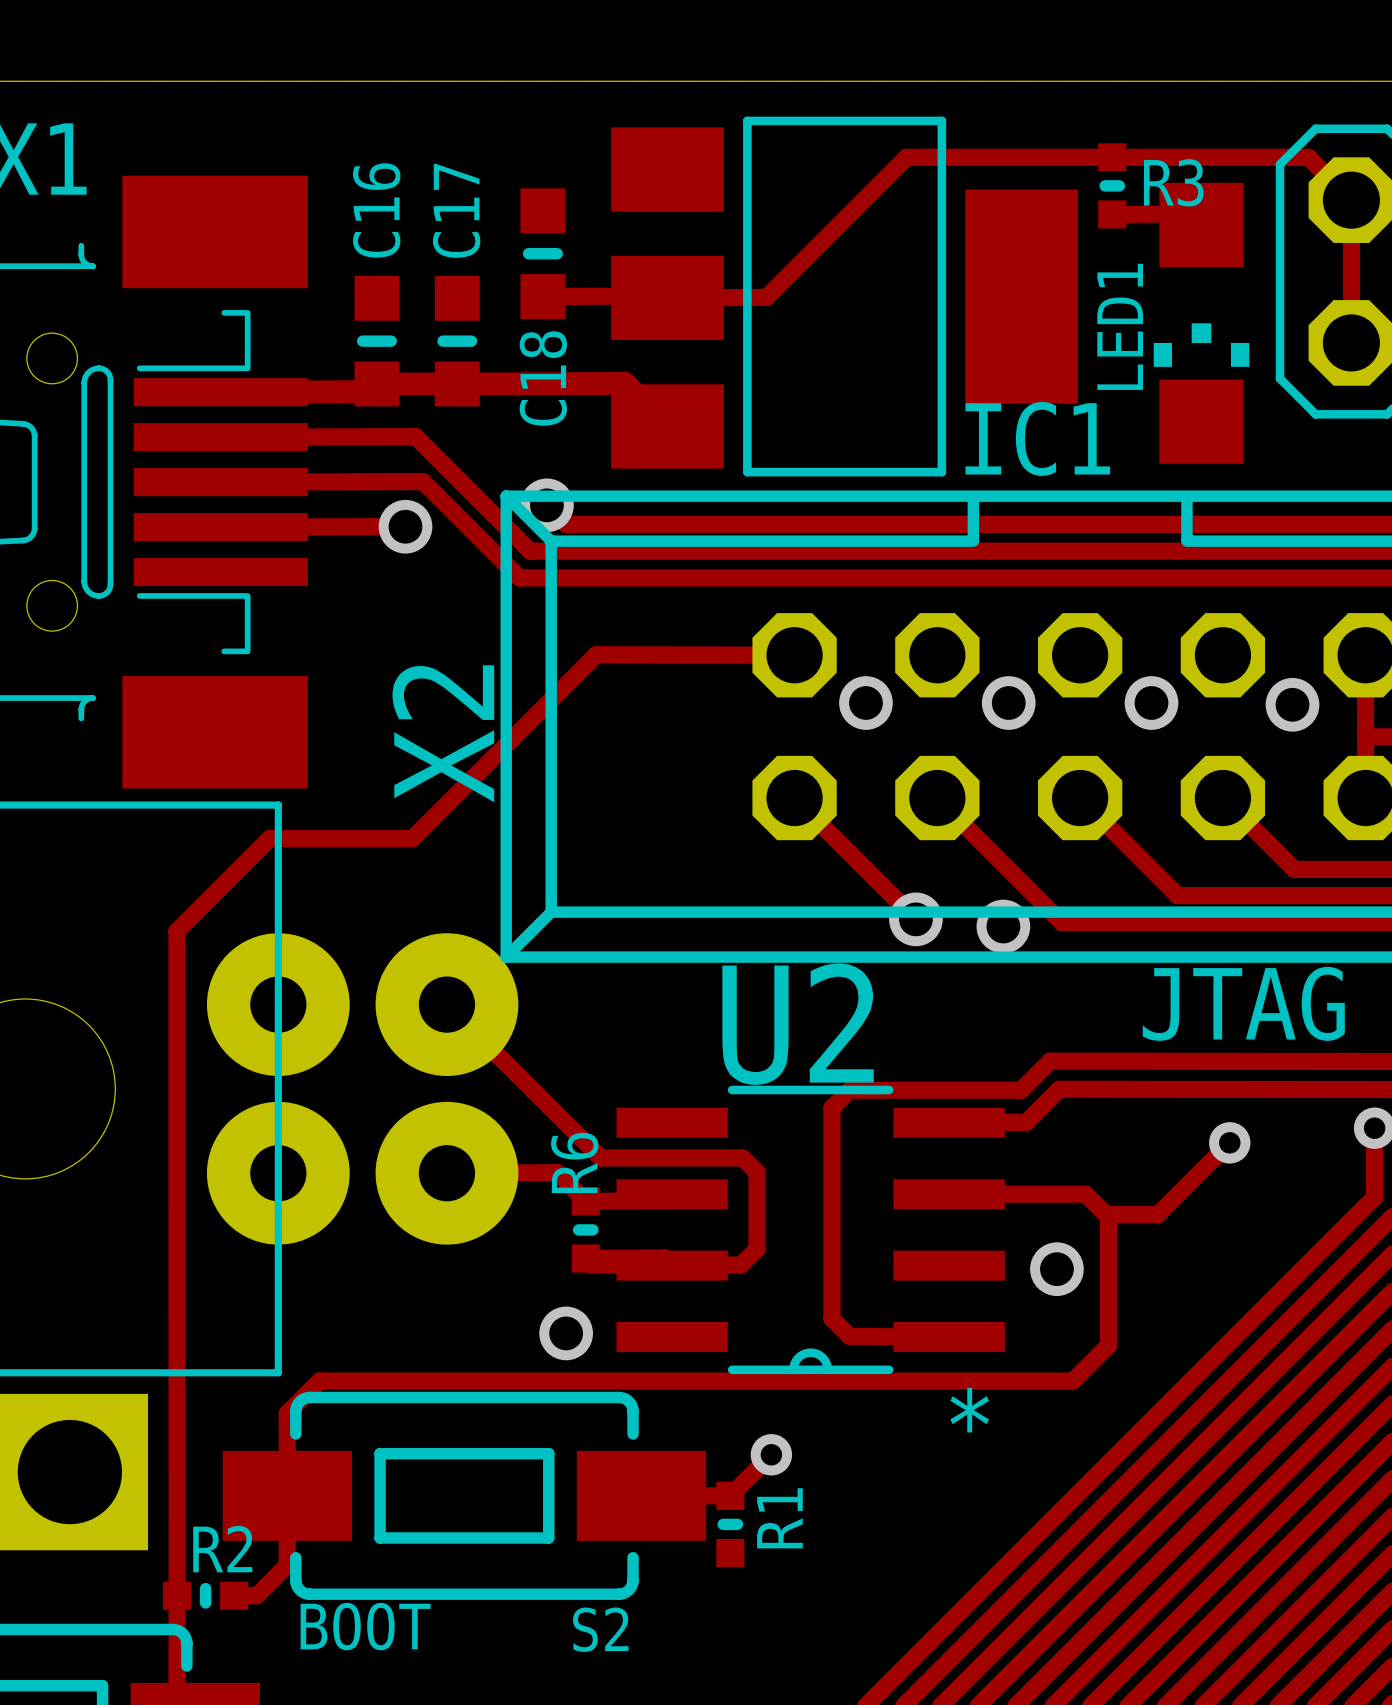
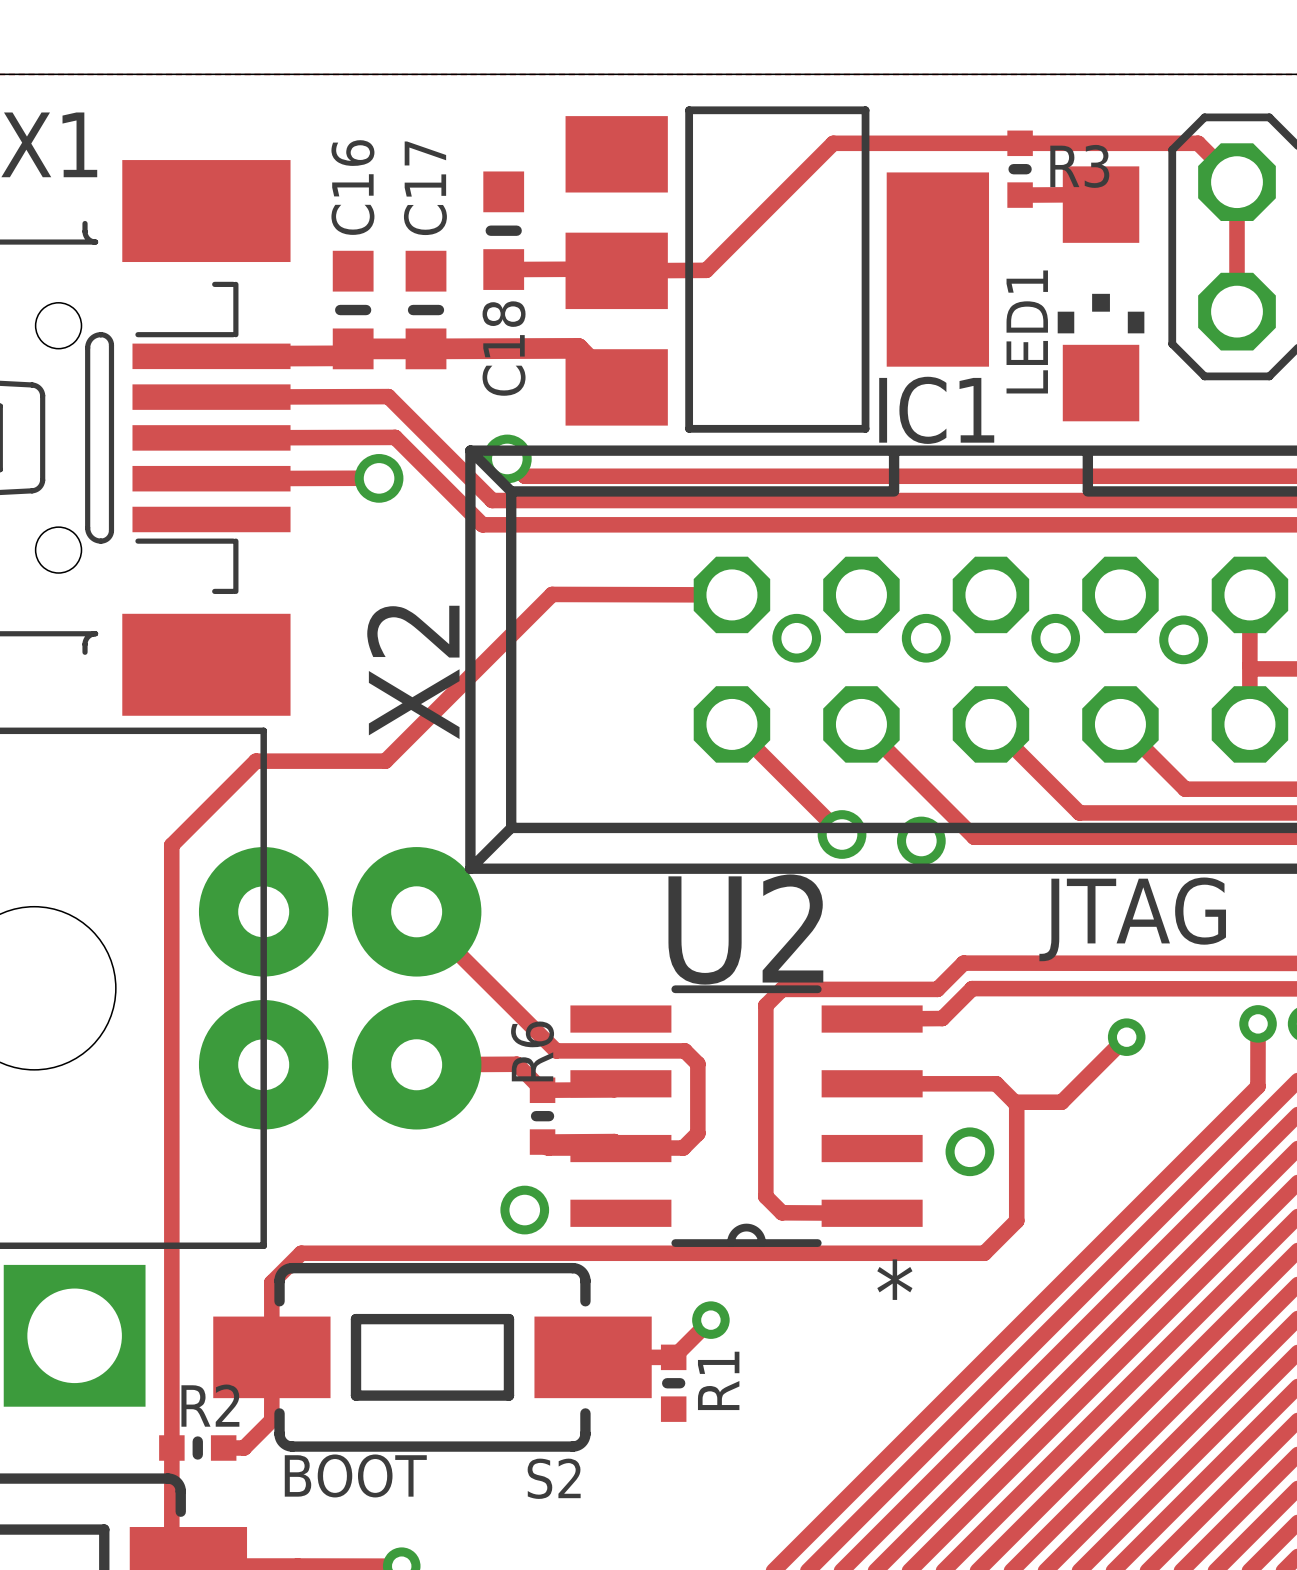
LED1 name position: LED1 (1120, 326) -> LED1 (1027, 331)
IC1 name position: IC1 (1037, 438) -> IC1 (936, 410)

